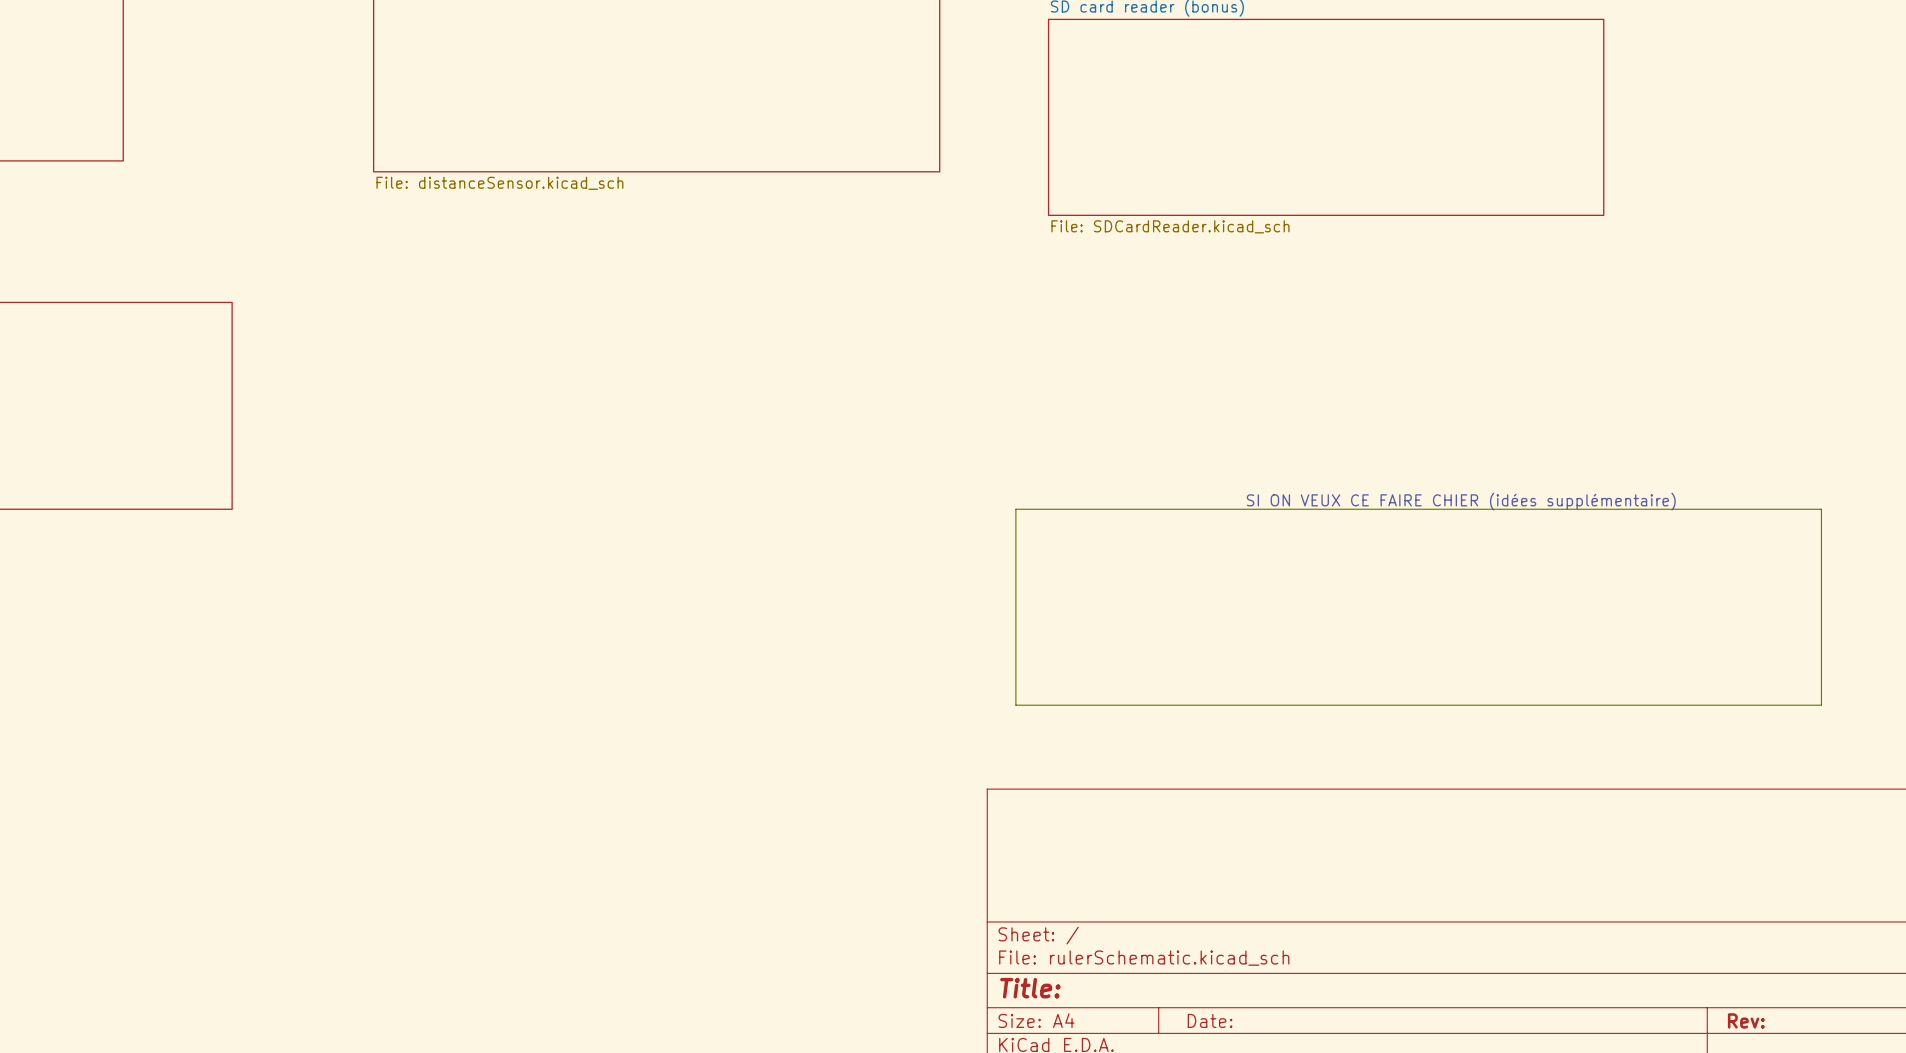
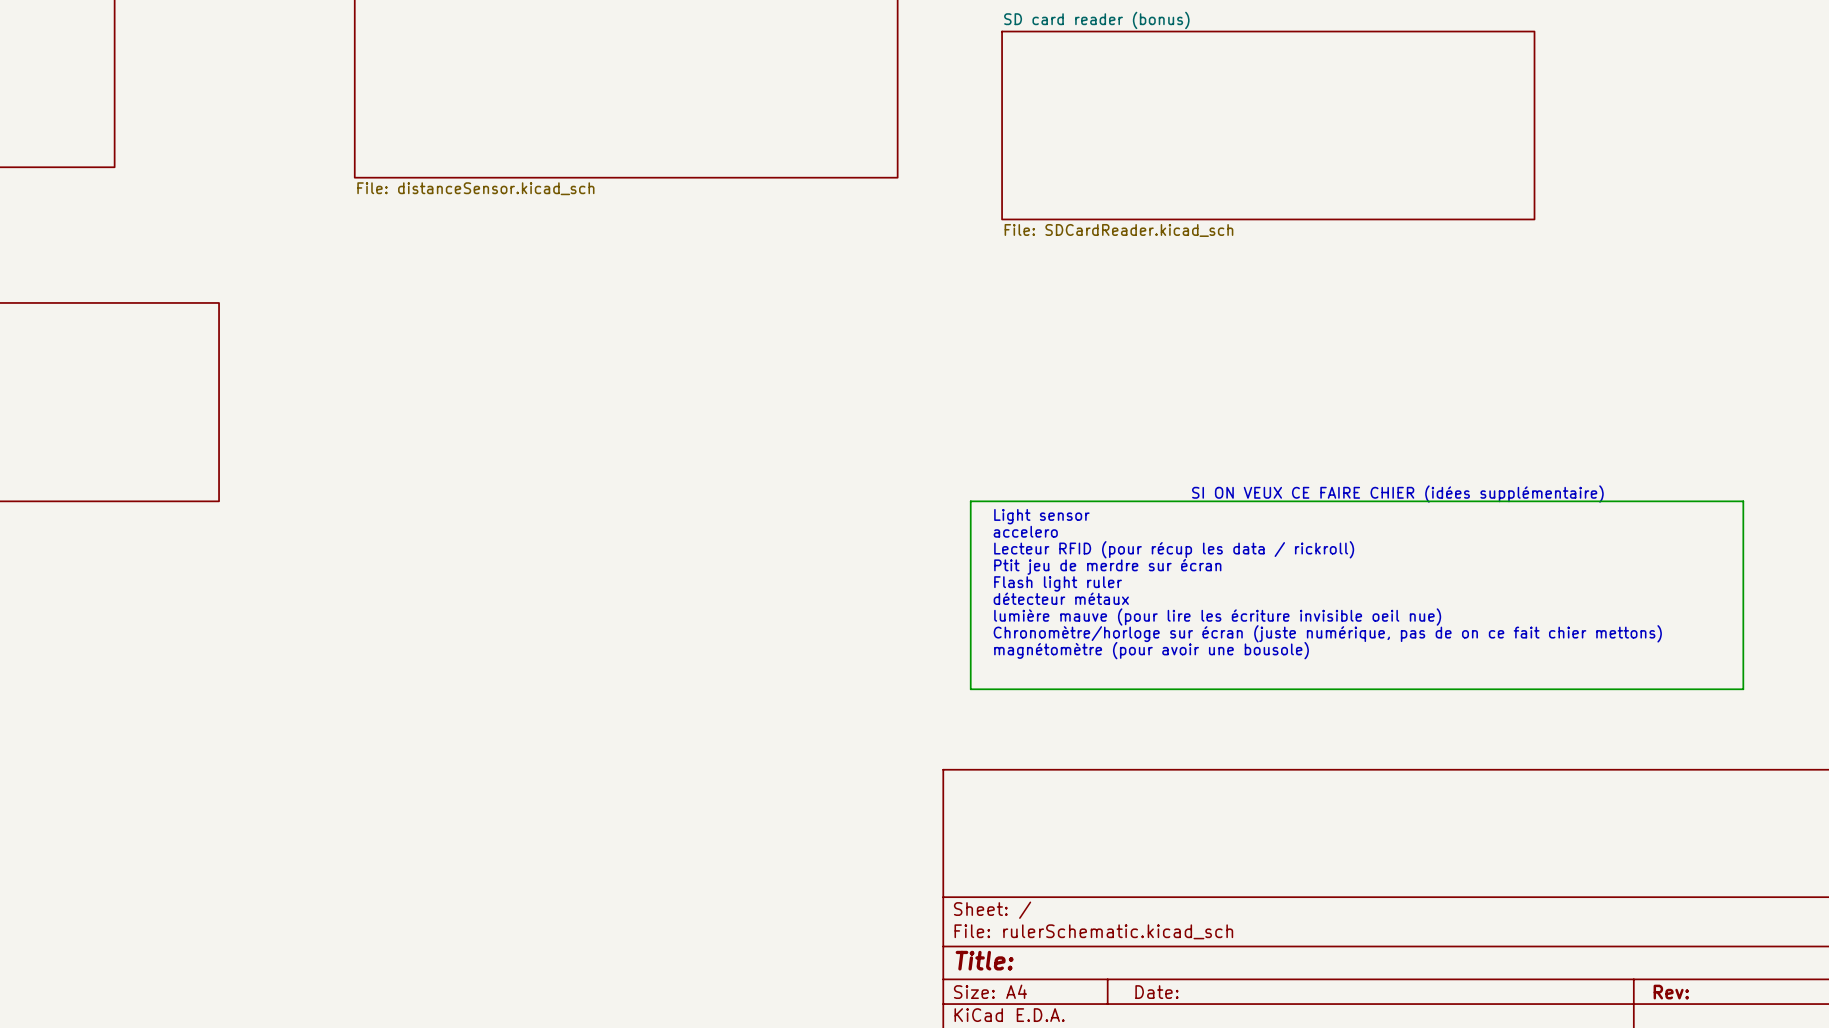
text: none -> Light sensor (1041, 516)
text: none -> accelero (1025, 531)
text: none -> Lecteur RFID (pour récup les data / rickroll) (1174, 549)
text: none -> Ptit jeu de merdre sur écran (1107, 566)
text: none -> Flash light ruler (1058, 583)
text: none -> détecteur métaux (1061, 598)
text: none -> lumière mauve (pour lire les écriture invisible oeil nue) (1217, 617)
text: none -> Chronomètre/horloge sur écran (juste numérique, pas de on ce fait chier mettons) (1327, 633)
text: none -> magnétomètre (pour avoir une bousole) (1151, 650)

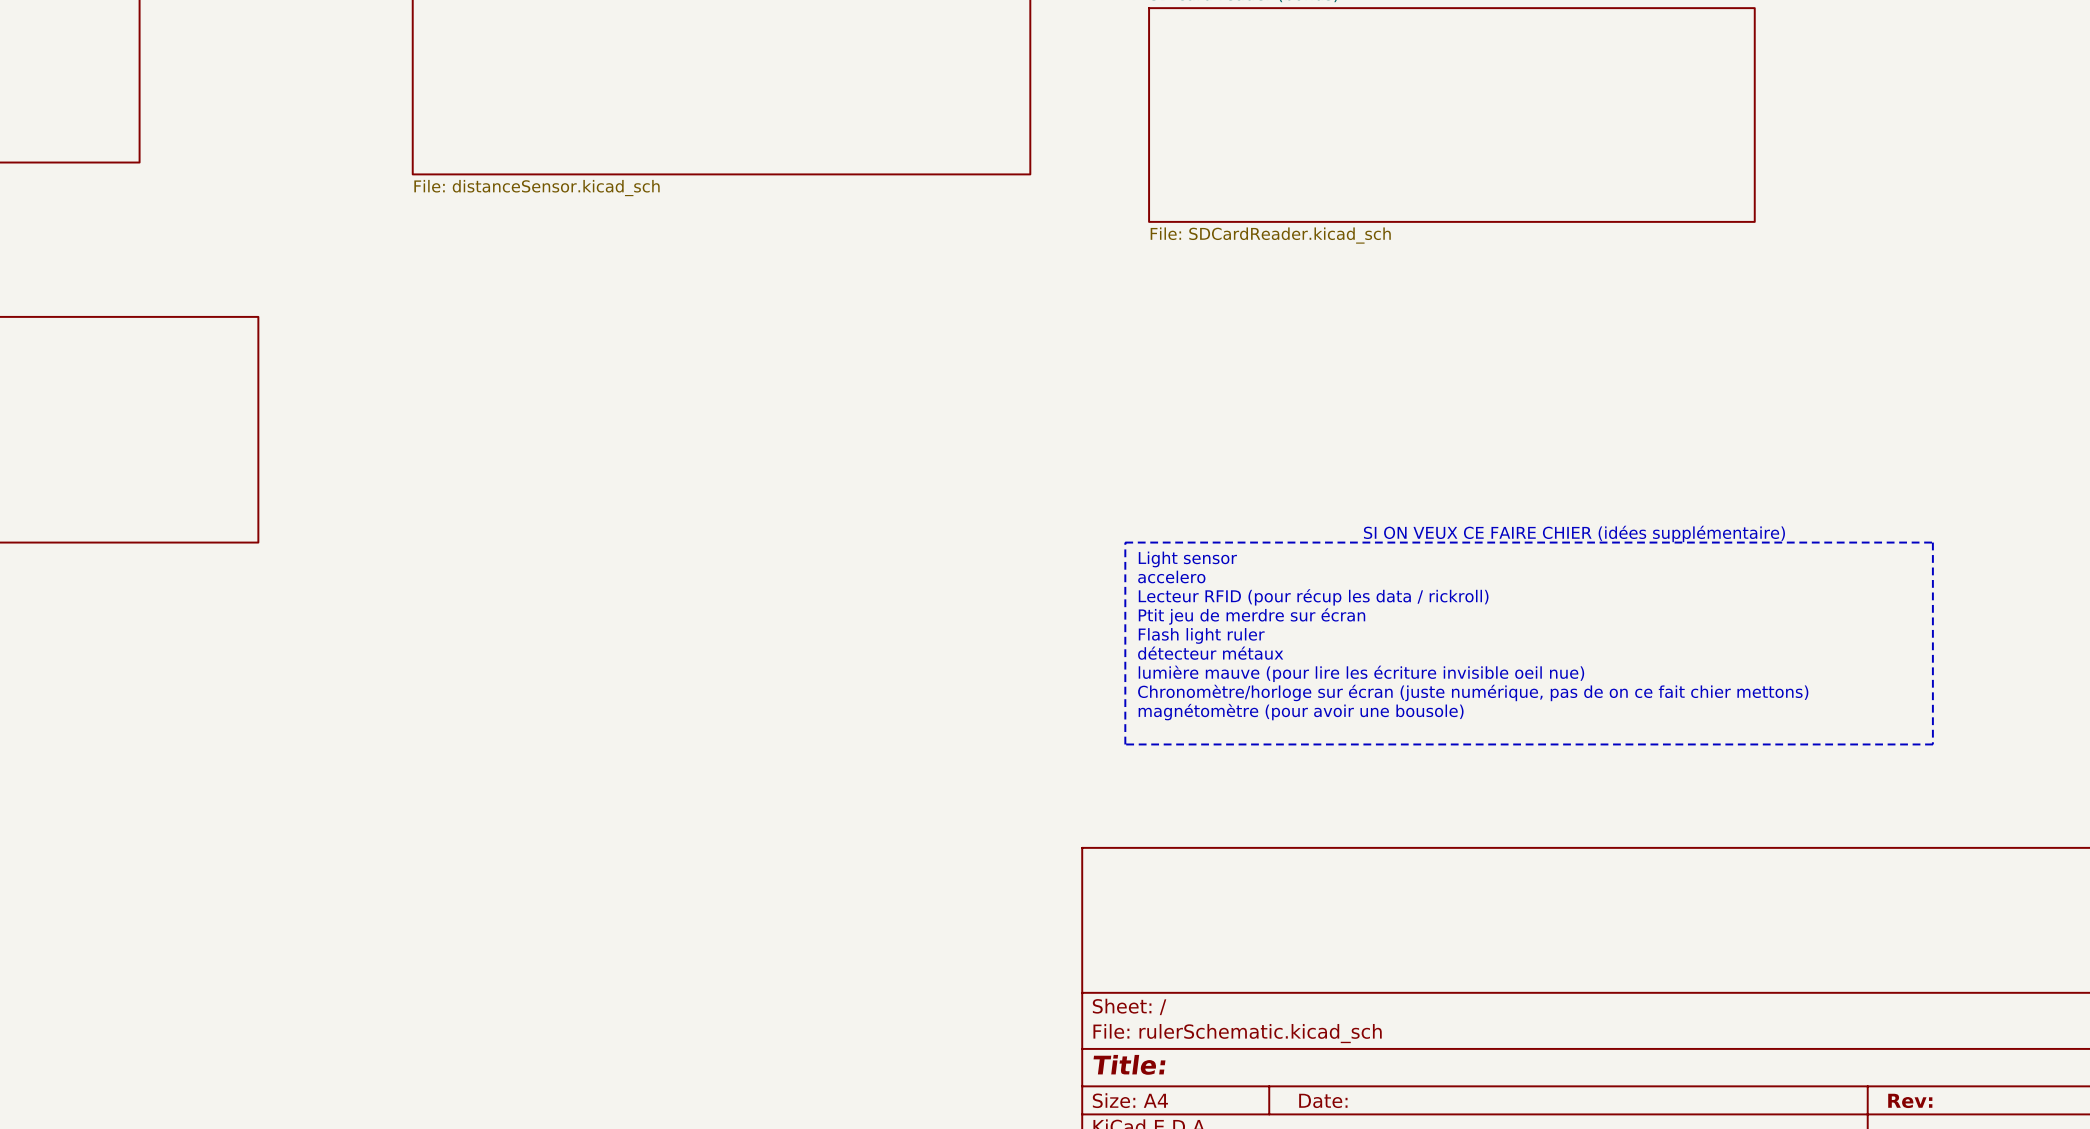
wire: (970, 501) (1743, 501) (1743, 689) (970, 689) (970, 501) -> none
line: none -> (1125, 542) (1932, 542) (1932, 744) (1125, 744) (1125, 542)

